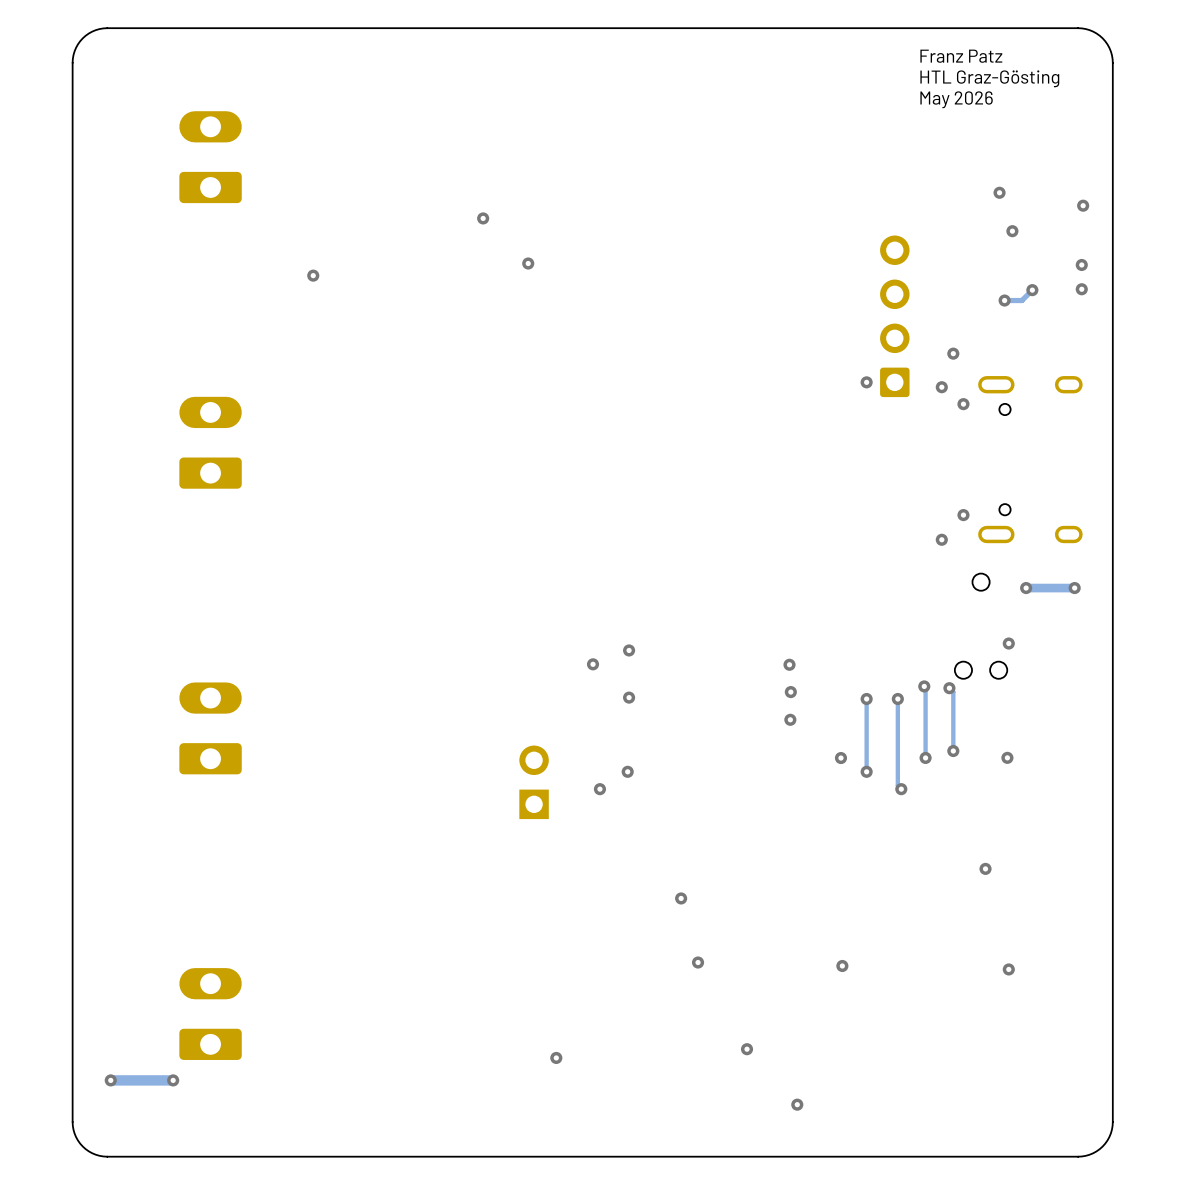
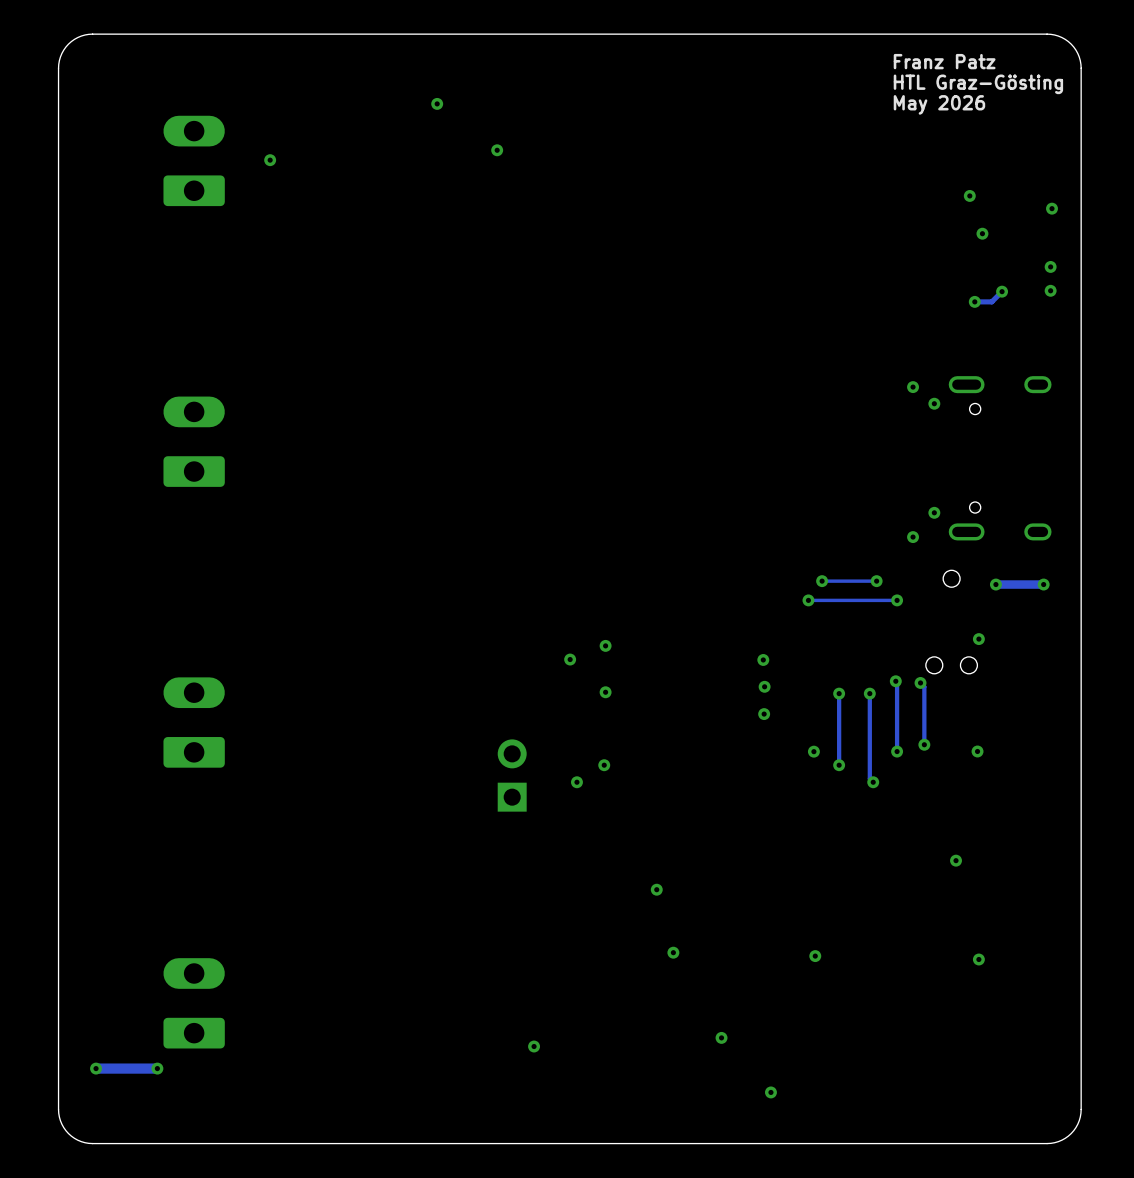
via: none -> (437, 103)
via: none -> (497, 150)
via: none -> (270, 160)
via: (483, 218) -> none
via: (528, 263) -> none
via: (313, 275) -> none
part: (894, 316) -> none
via: (953, 353) -> none
via: (866, 382) -> none
via: none -> (822, 581)
track: none -> (876, 581) (822, 581)
via: none -> (876, 581)
via: none -> (808, 600)
track: none -> (897, 600) (808, 600)
via: none -> (897, 600)

